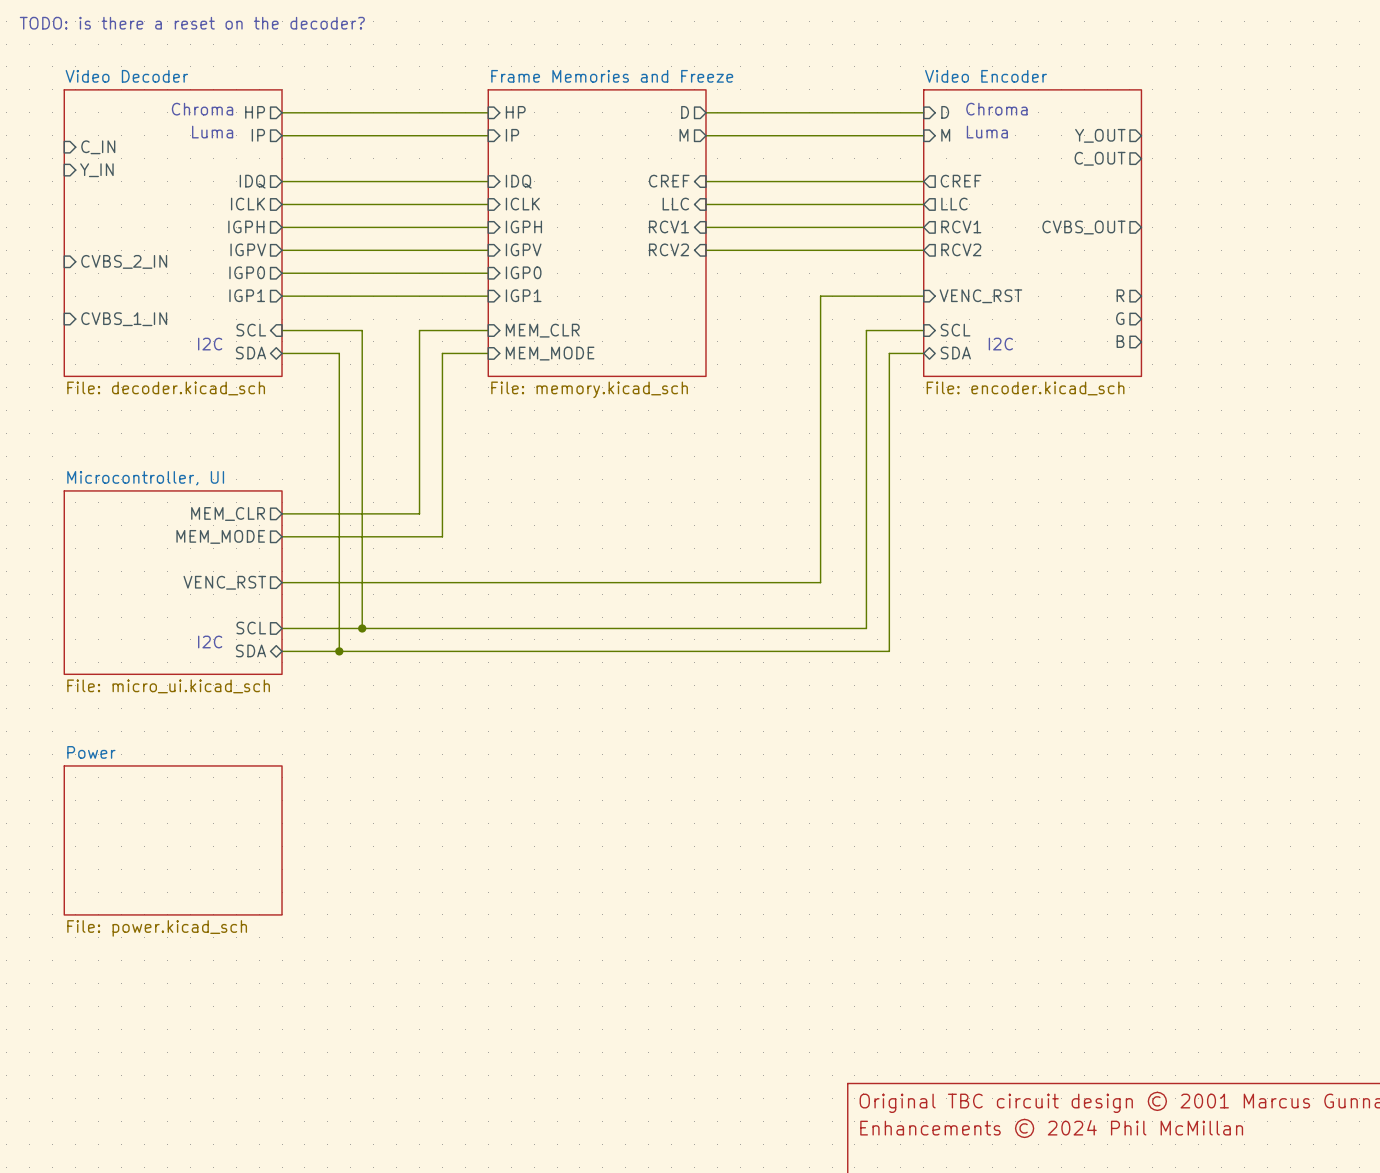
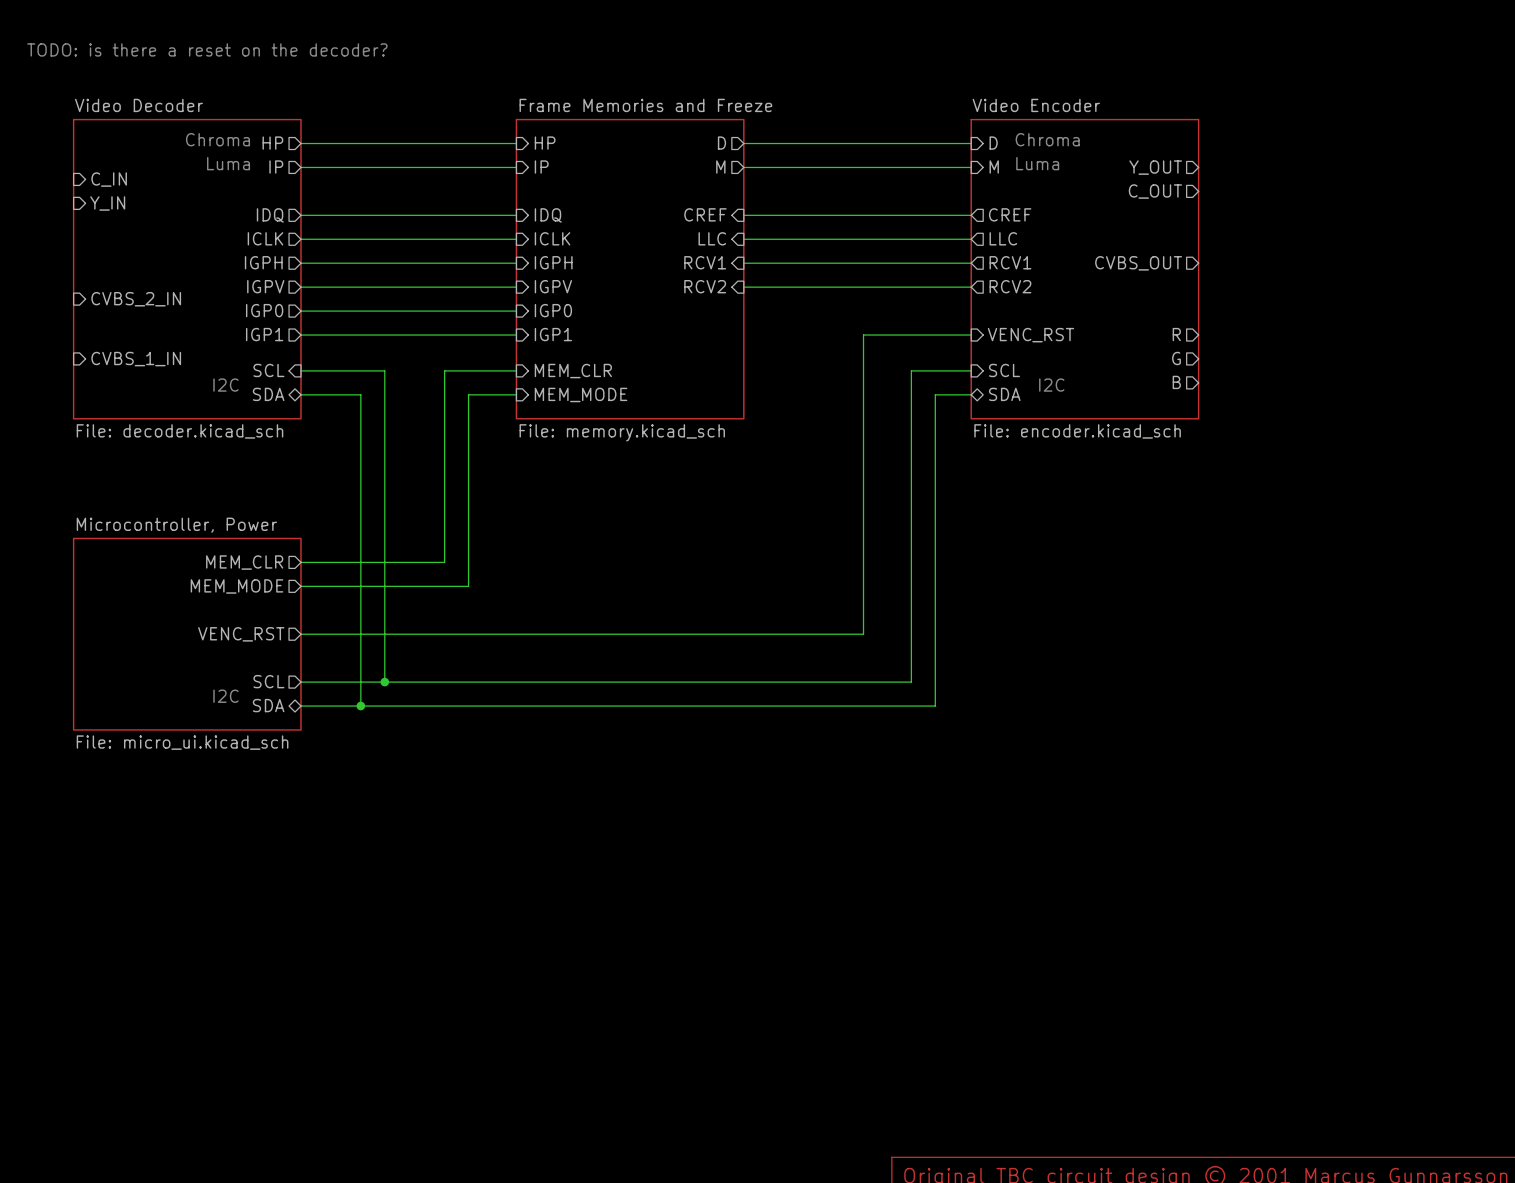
sheet Microcontroller, UI name: Microcontroller, UI (145, 478) -> Microcontroller, Power (176, 525)
sheet Power: File: power.kicad_sch (173, 840) -> none

